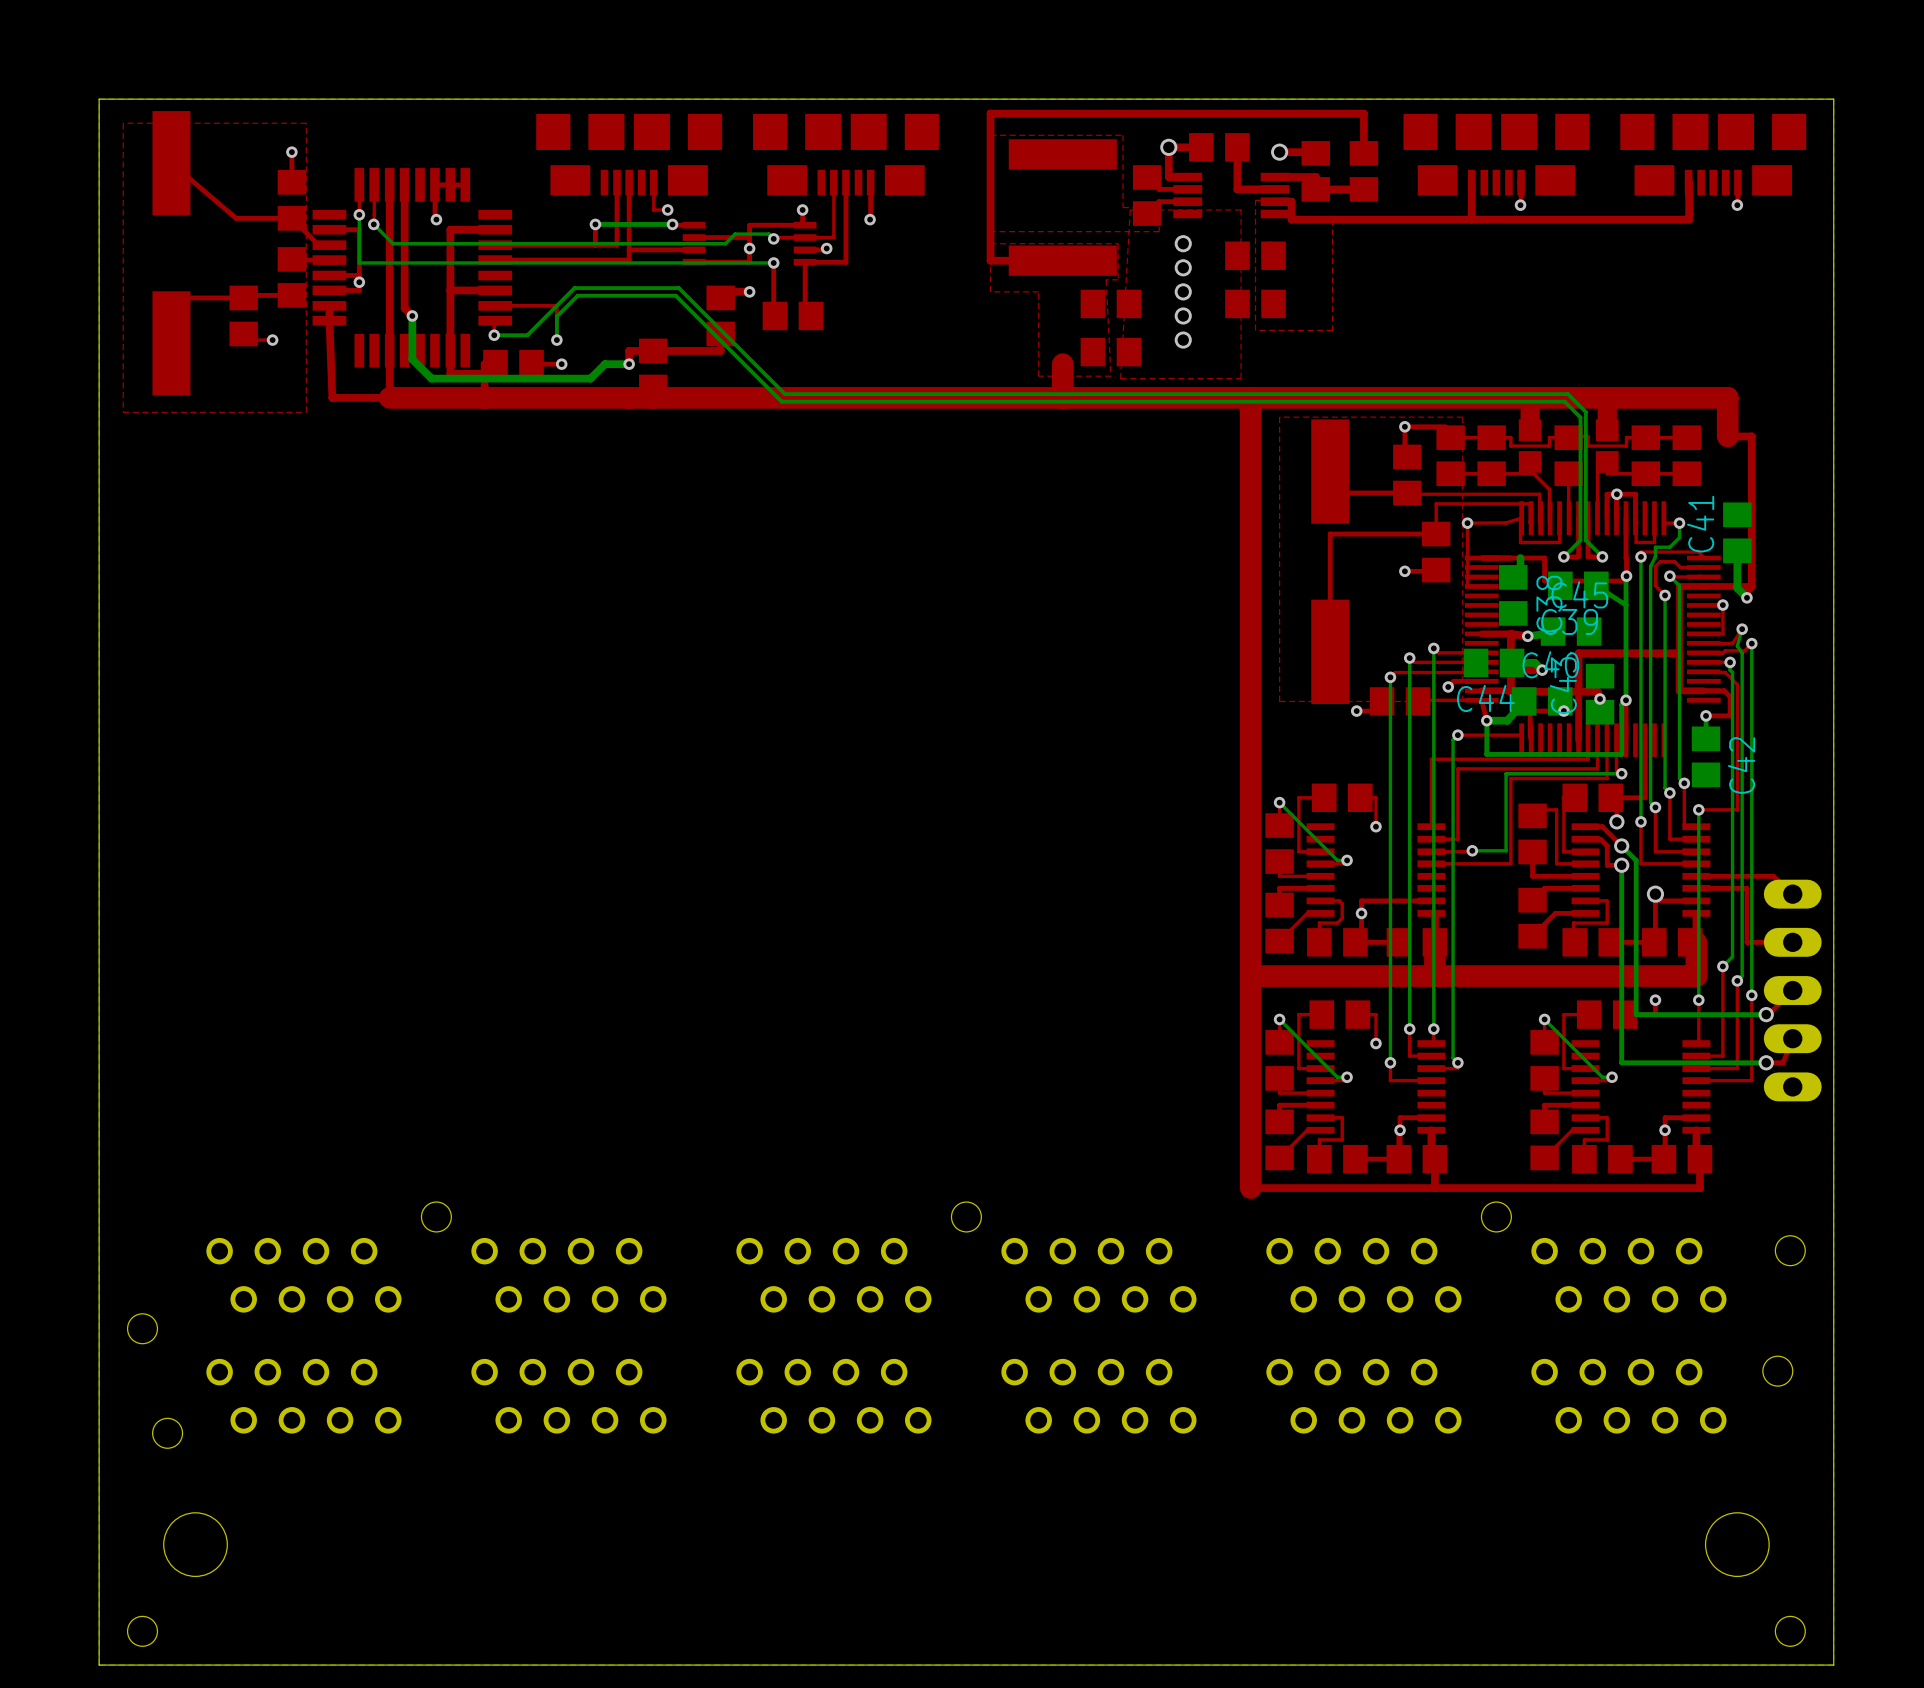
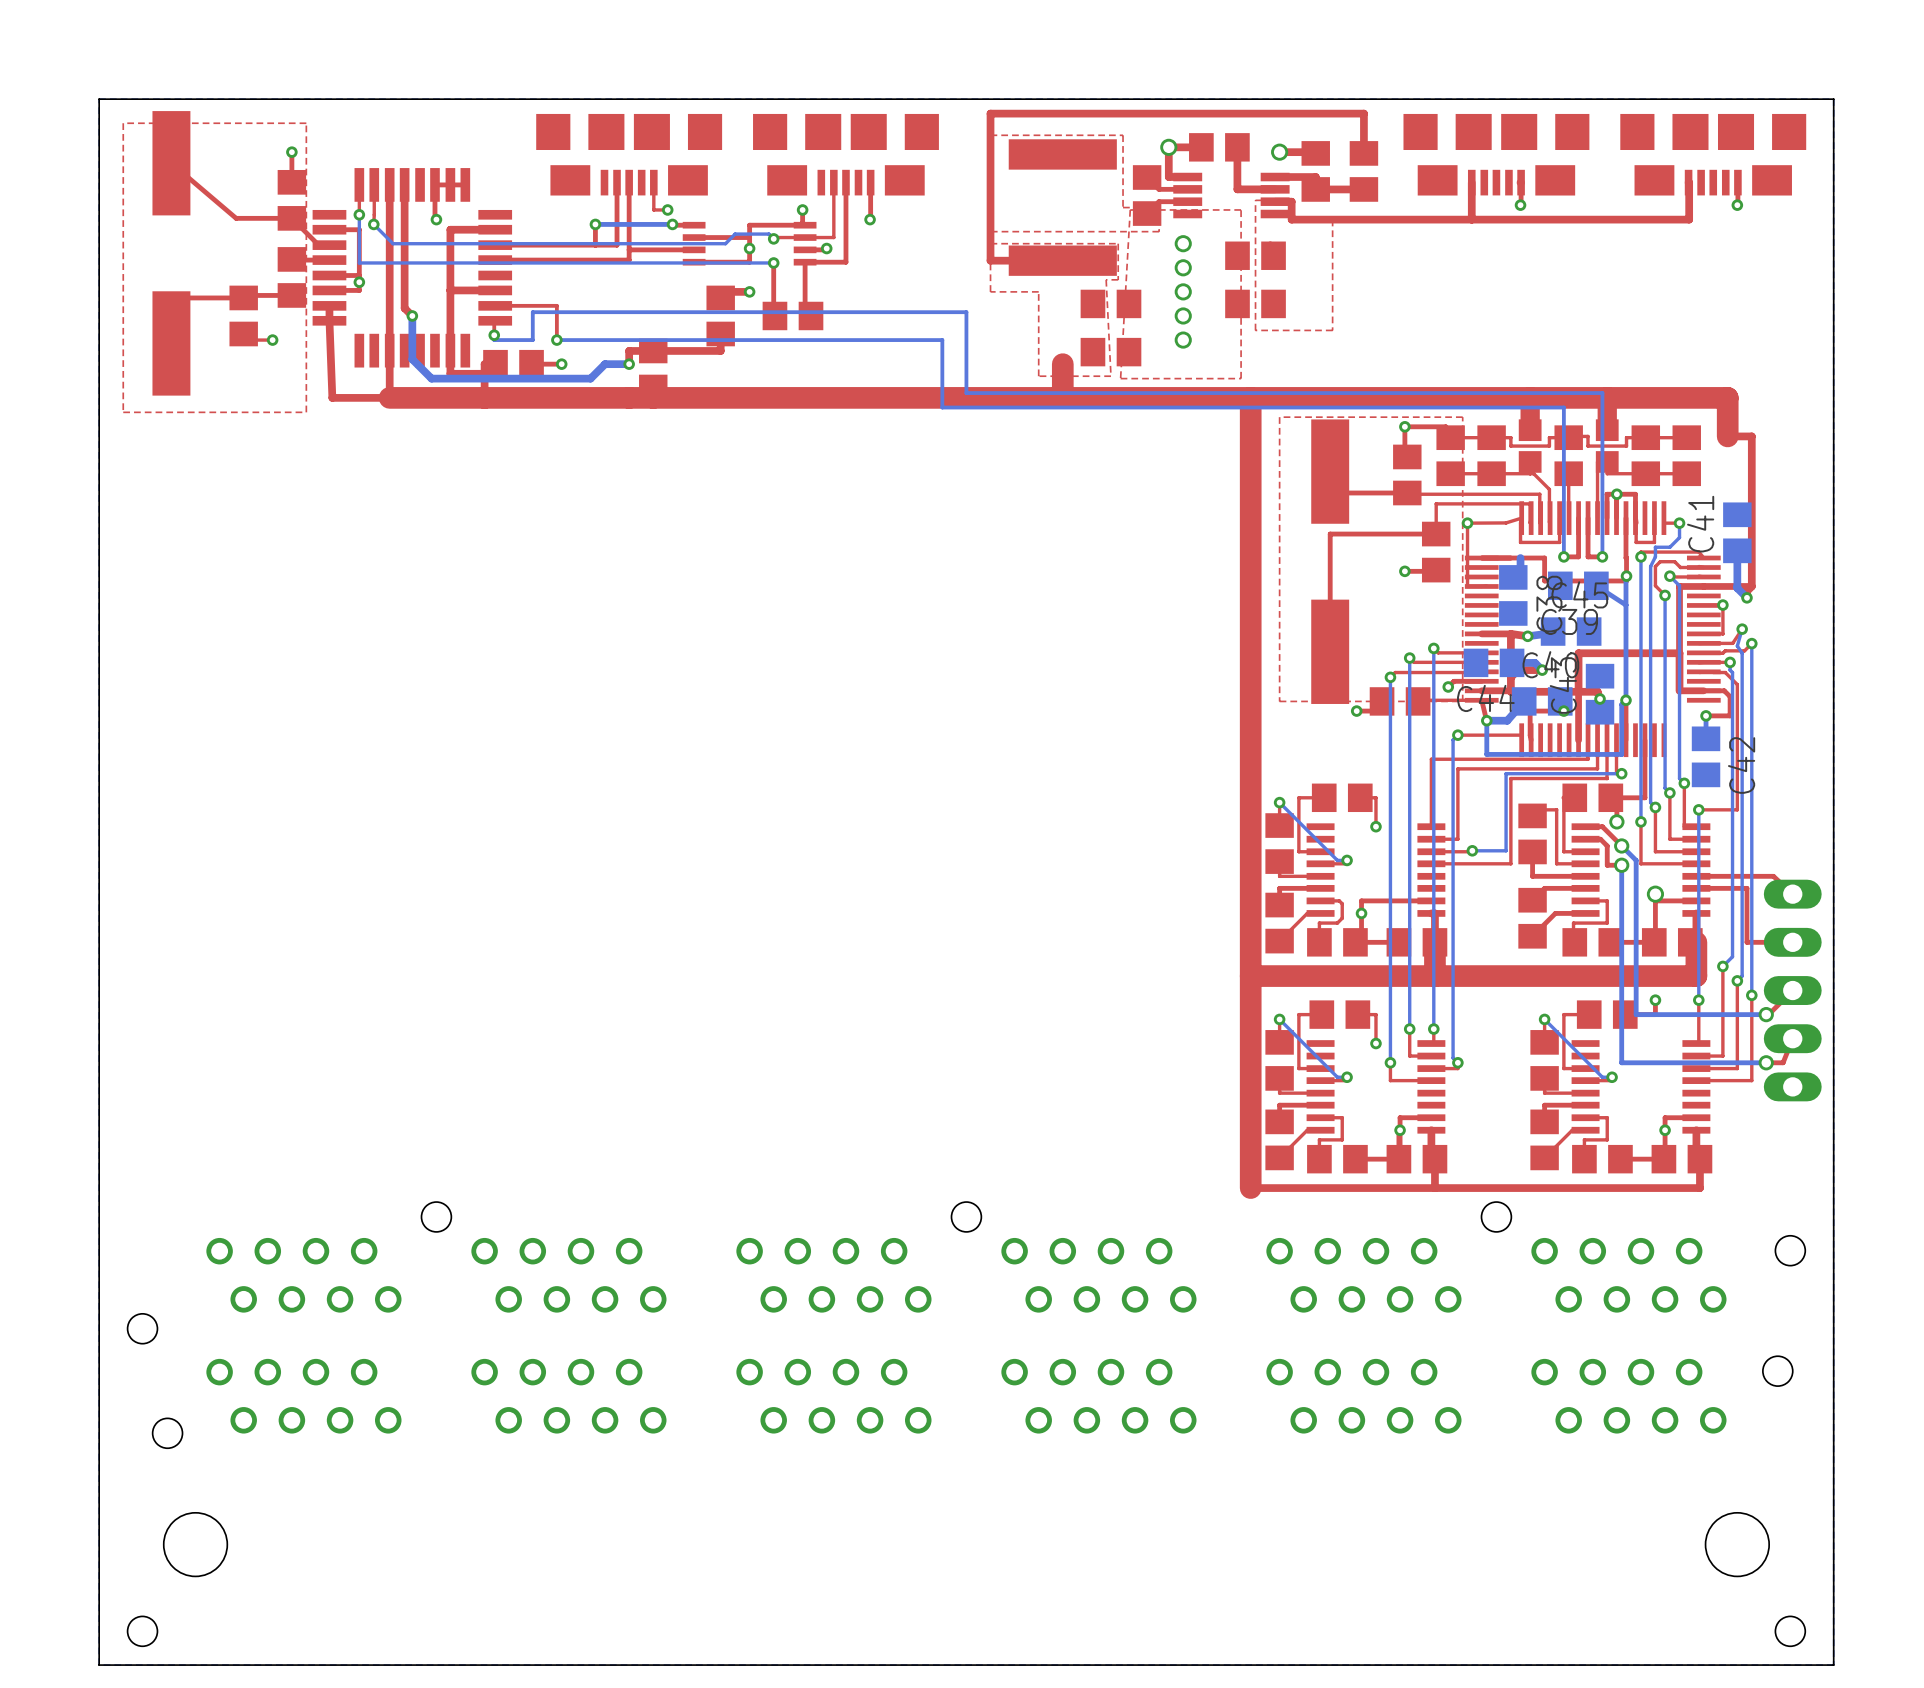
bottom track: (494, 335) (527, 335) (574, 288) (678, 288) (784, 394) (1567, 394) (1585, 412) (1585, 540) (1602, 556) -> (494, 335) (494, 340) (532, 340) (532, 312) (966, 312) (966, 393) (1602, 393) (1602, 556)
bottom track: (556, 340) (556, 316) (577, 295) (675, 295) (781, 401) (1564, 401) (1580, 417) (1580, 540) (1563, 556) -> (556, 340) (942, 340) (942, 407) (1563, 407) (1563, 556)

